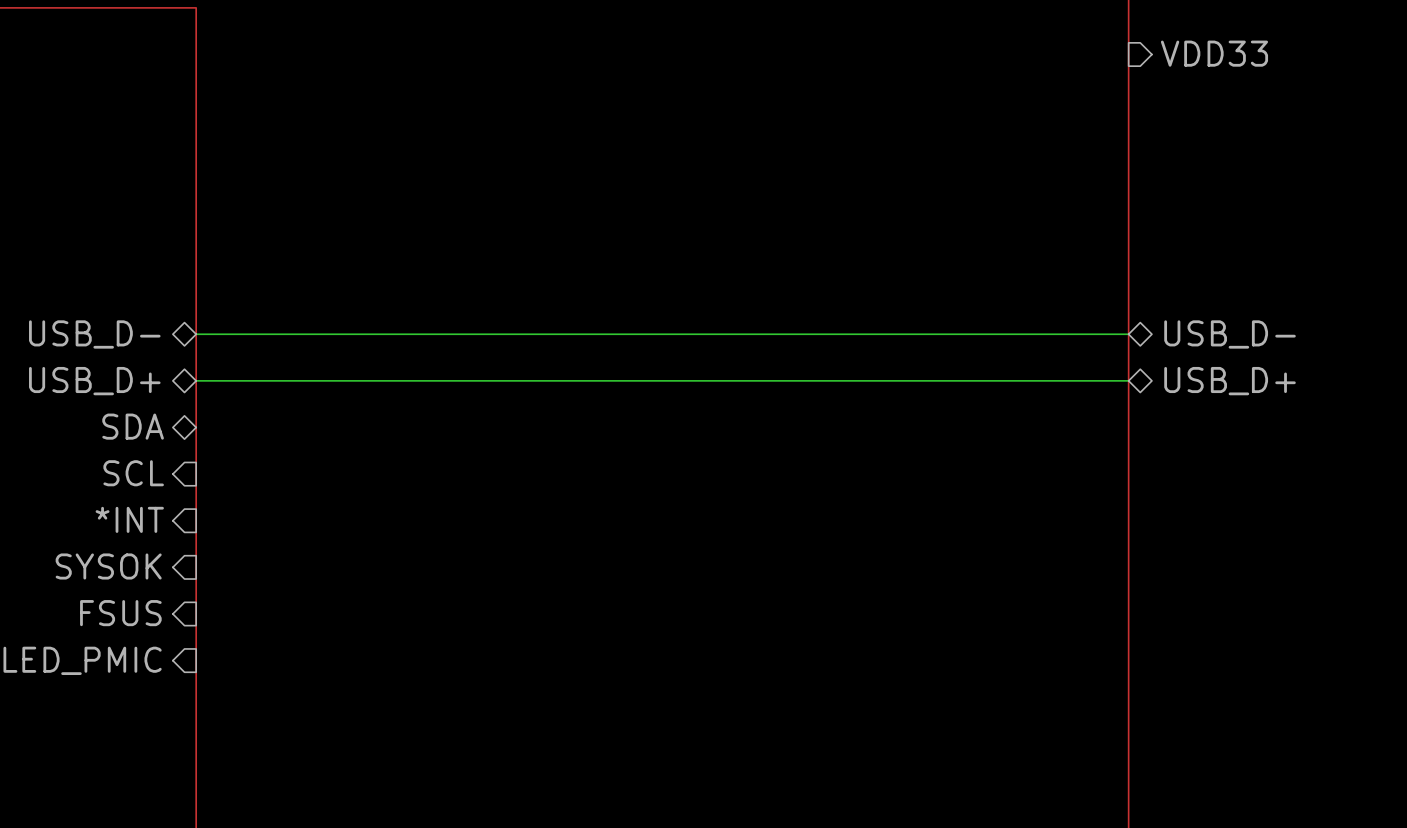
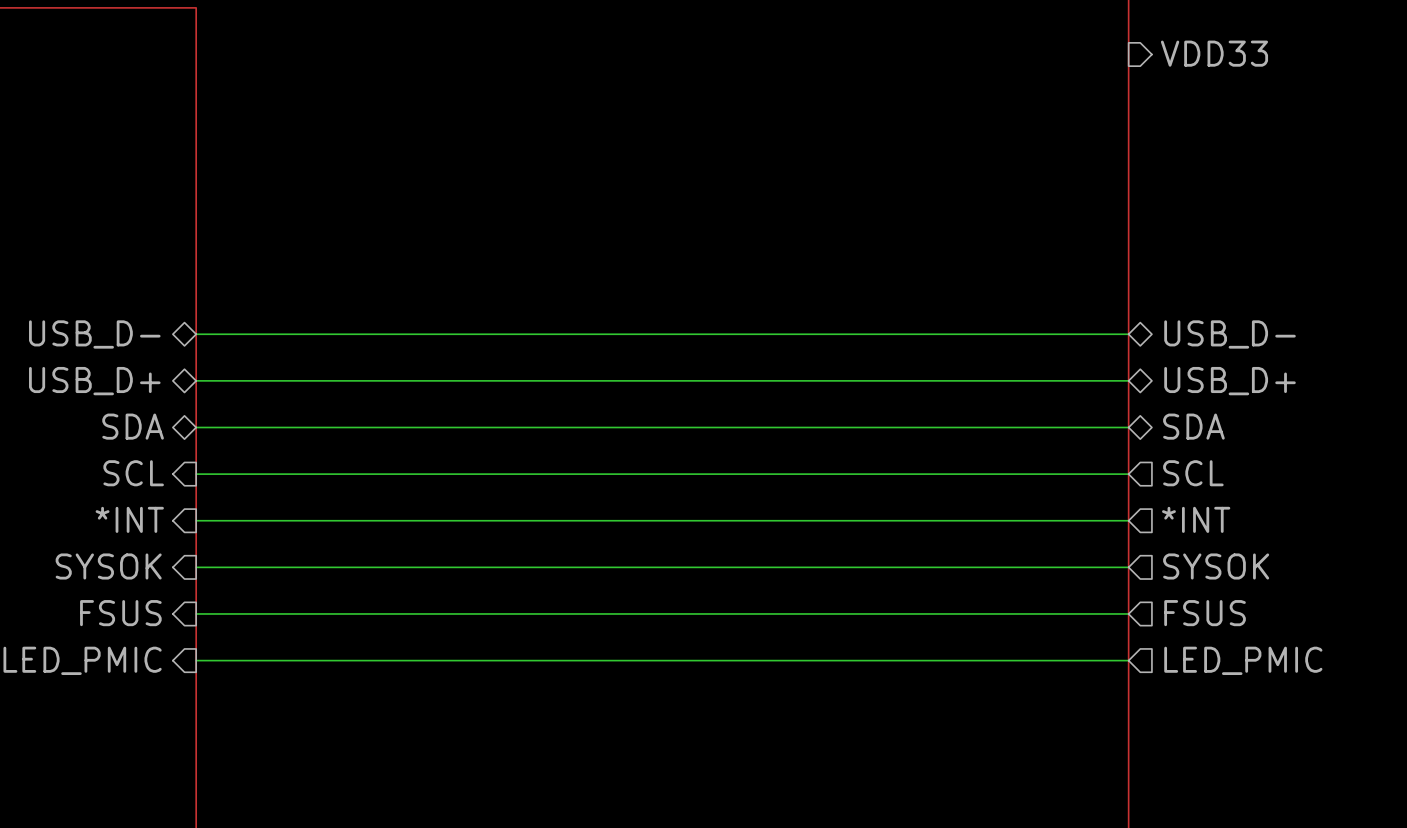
sheet pin: none -> SDA (1193, 426)
wire: none -> (196, 427) (1128, 427)
sheet pin: none -> SCL (1193, 473)
wire: none -> (196, 474) (1128, 474)
sheet pin: none -> *INT (1196, 519)
wire: none -> (196, 520) (1128, 520)
sheet pin: none -> SYSOK (1216, 566)
wire: none -> (196, 567) (1128, 567)
wire: none -> (196, 613) (1128, 613)
sheet pin: none -> FSUS (1205, 613)
wire: none -> (196, 660) (1128, 660)
sheet pin: none -> LED_PMIC (1243, 660)

